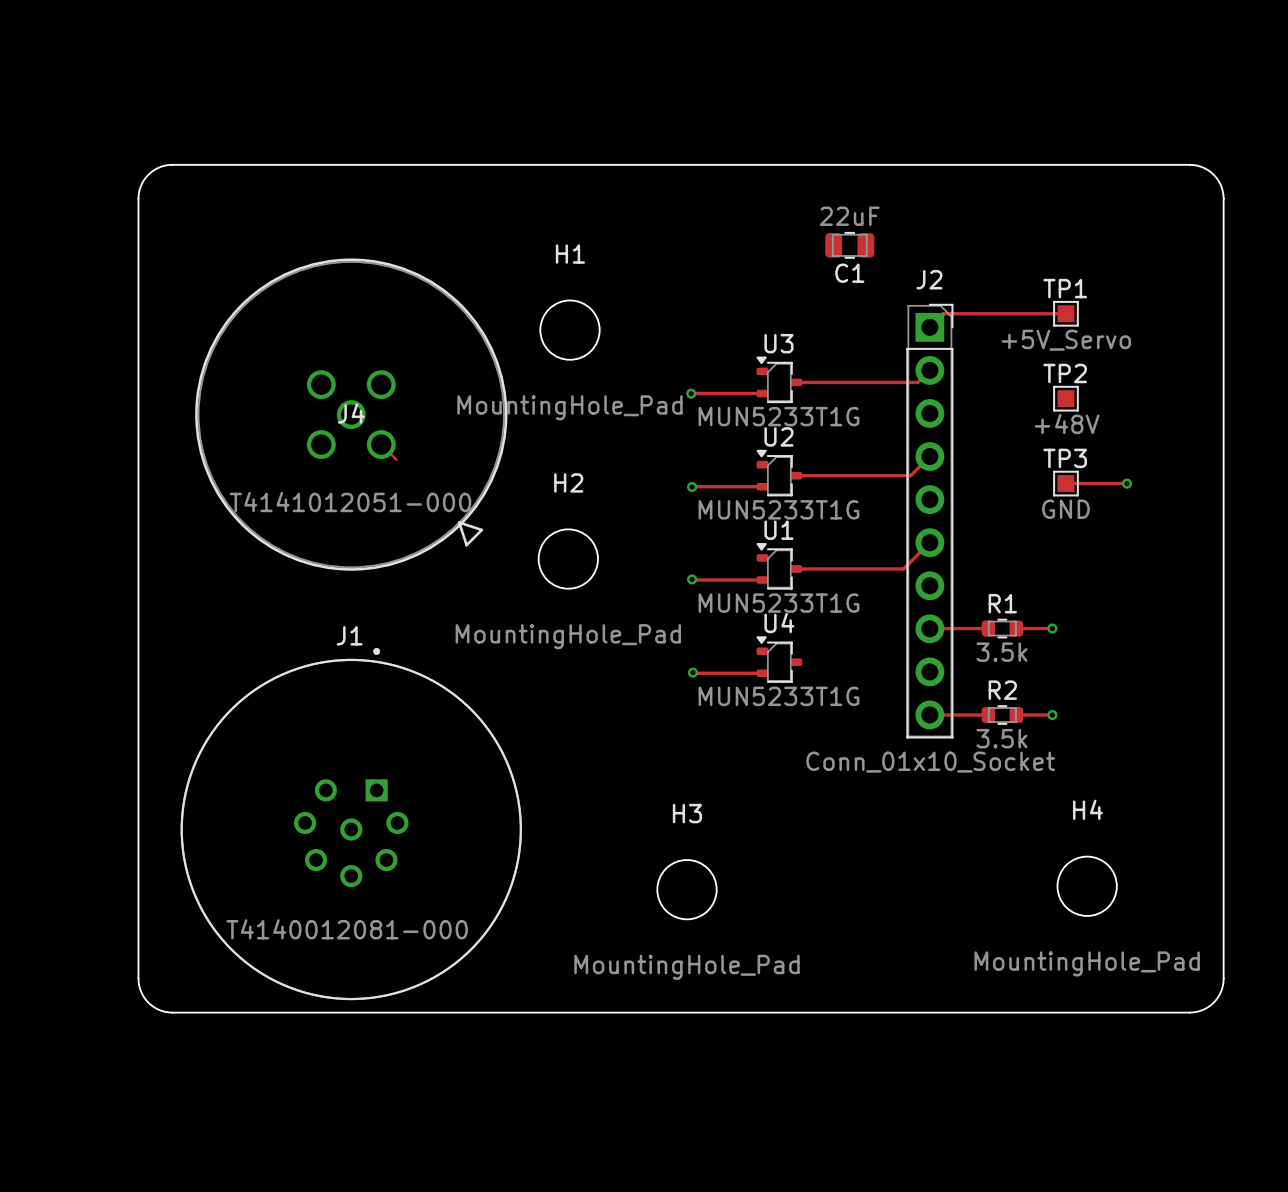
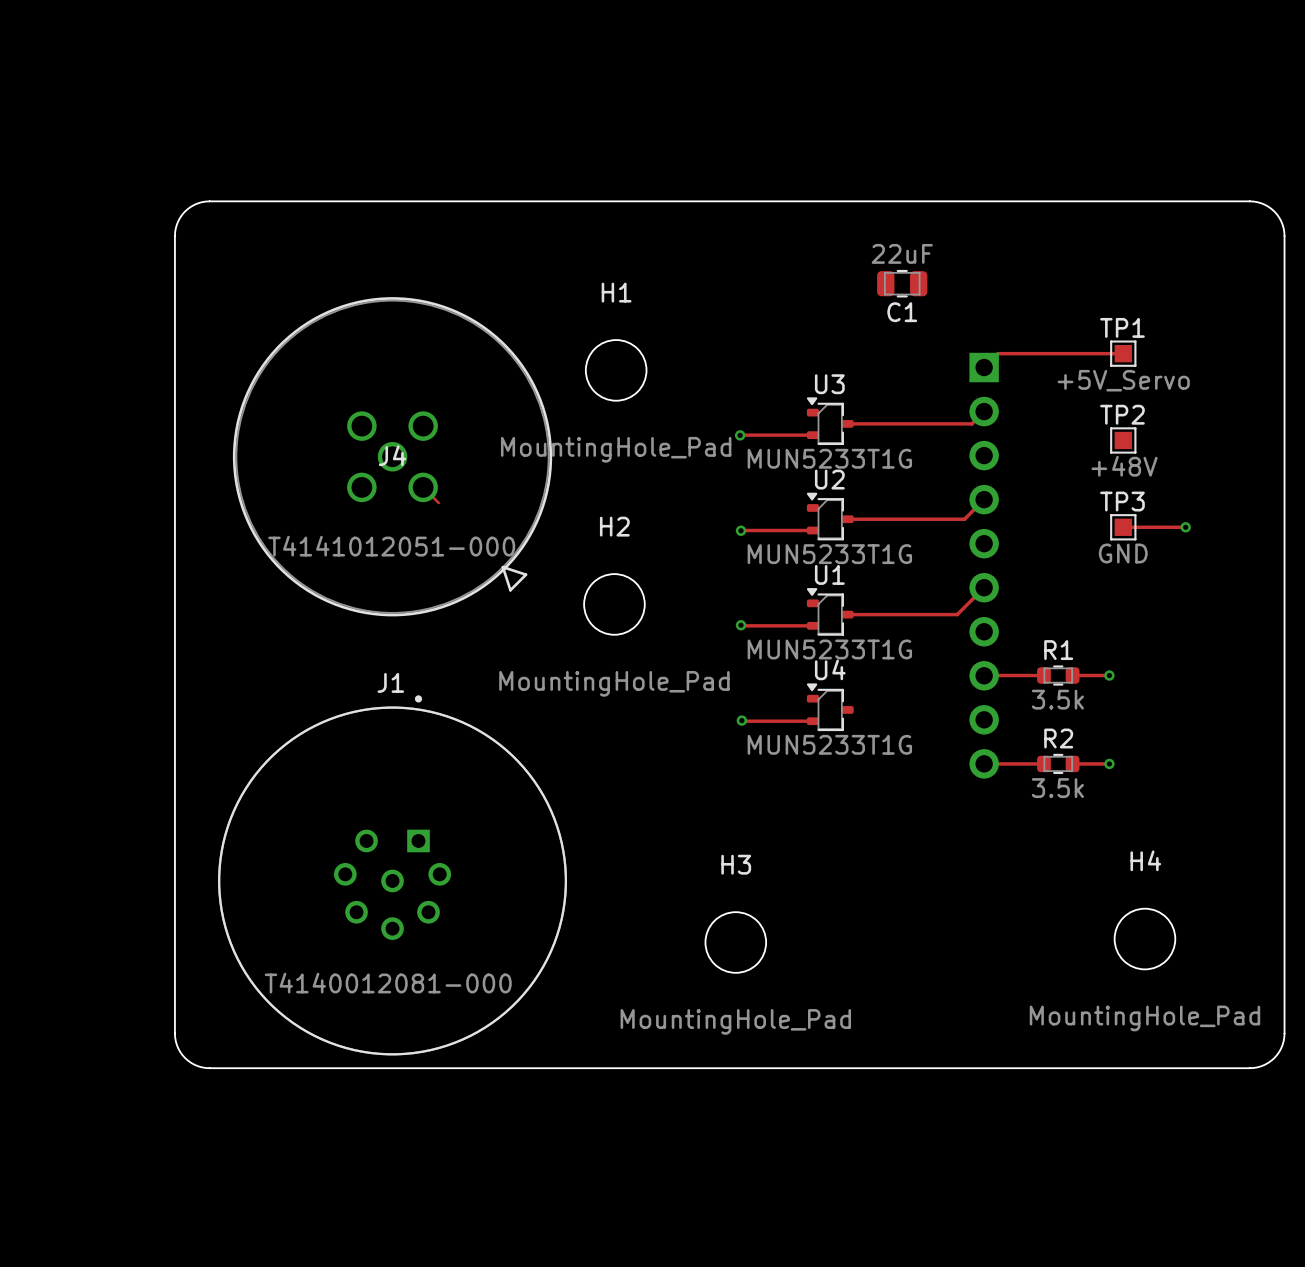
J2 side: top (929, 521) -> bottom (984, 565)

